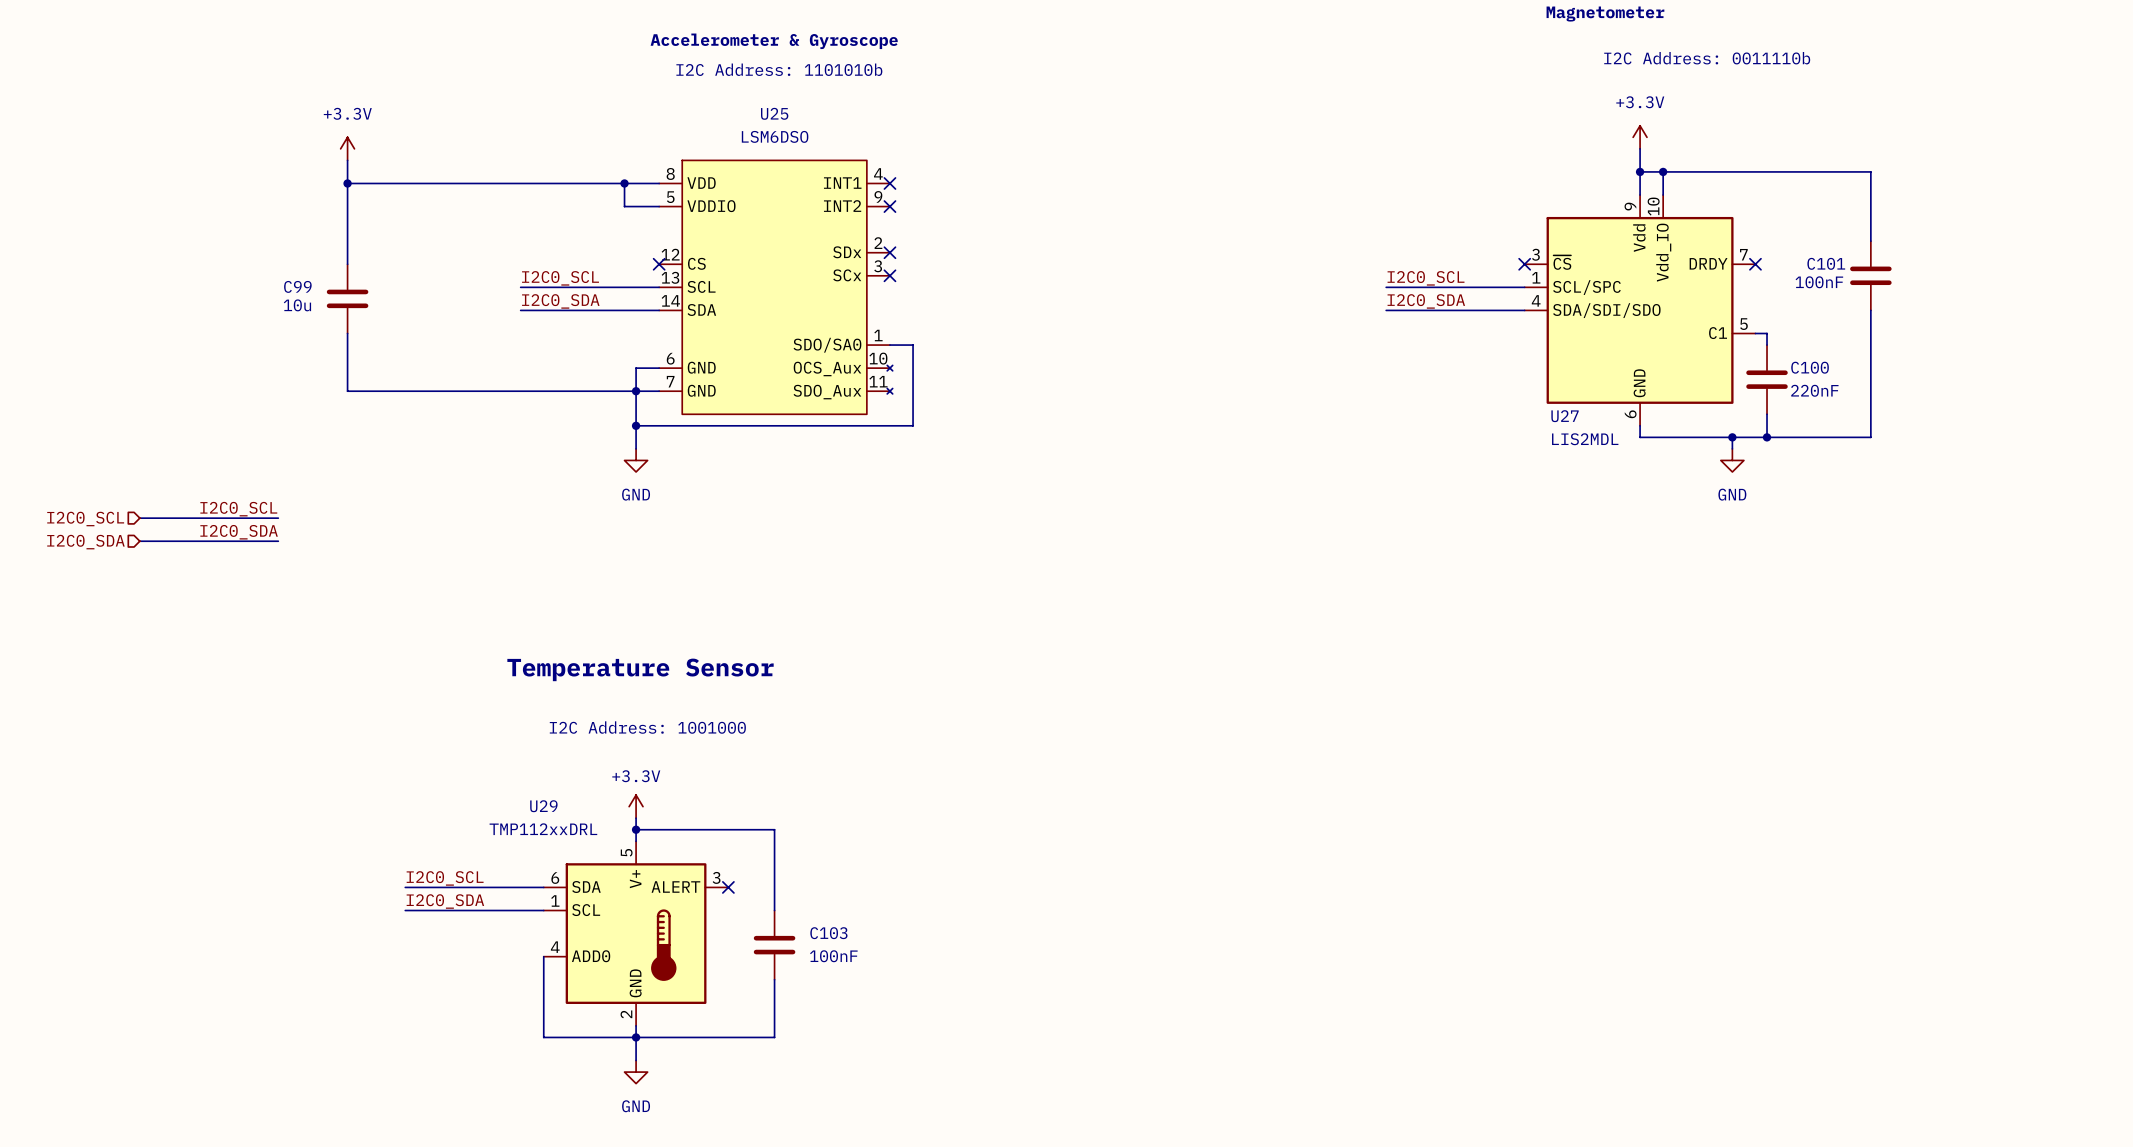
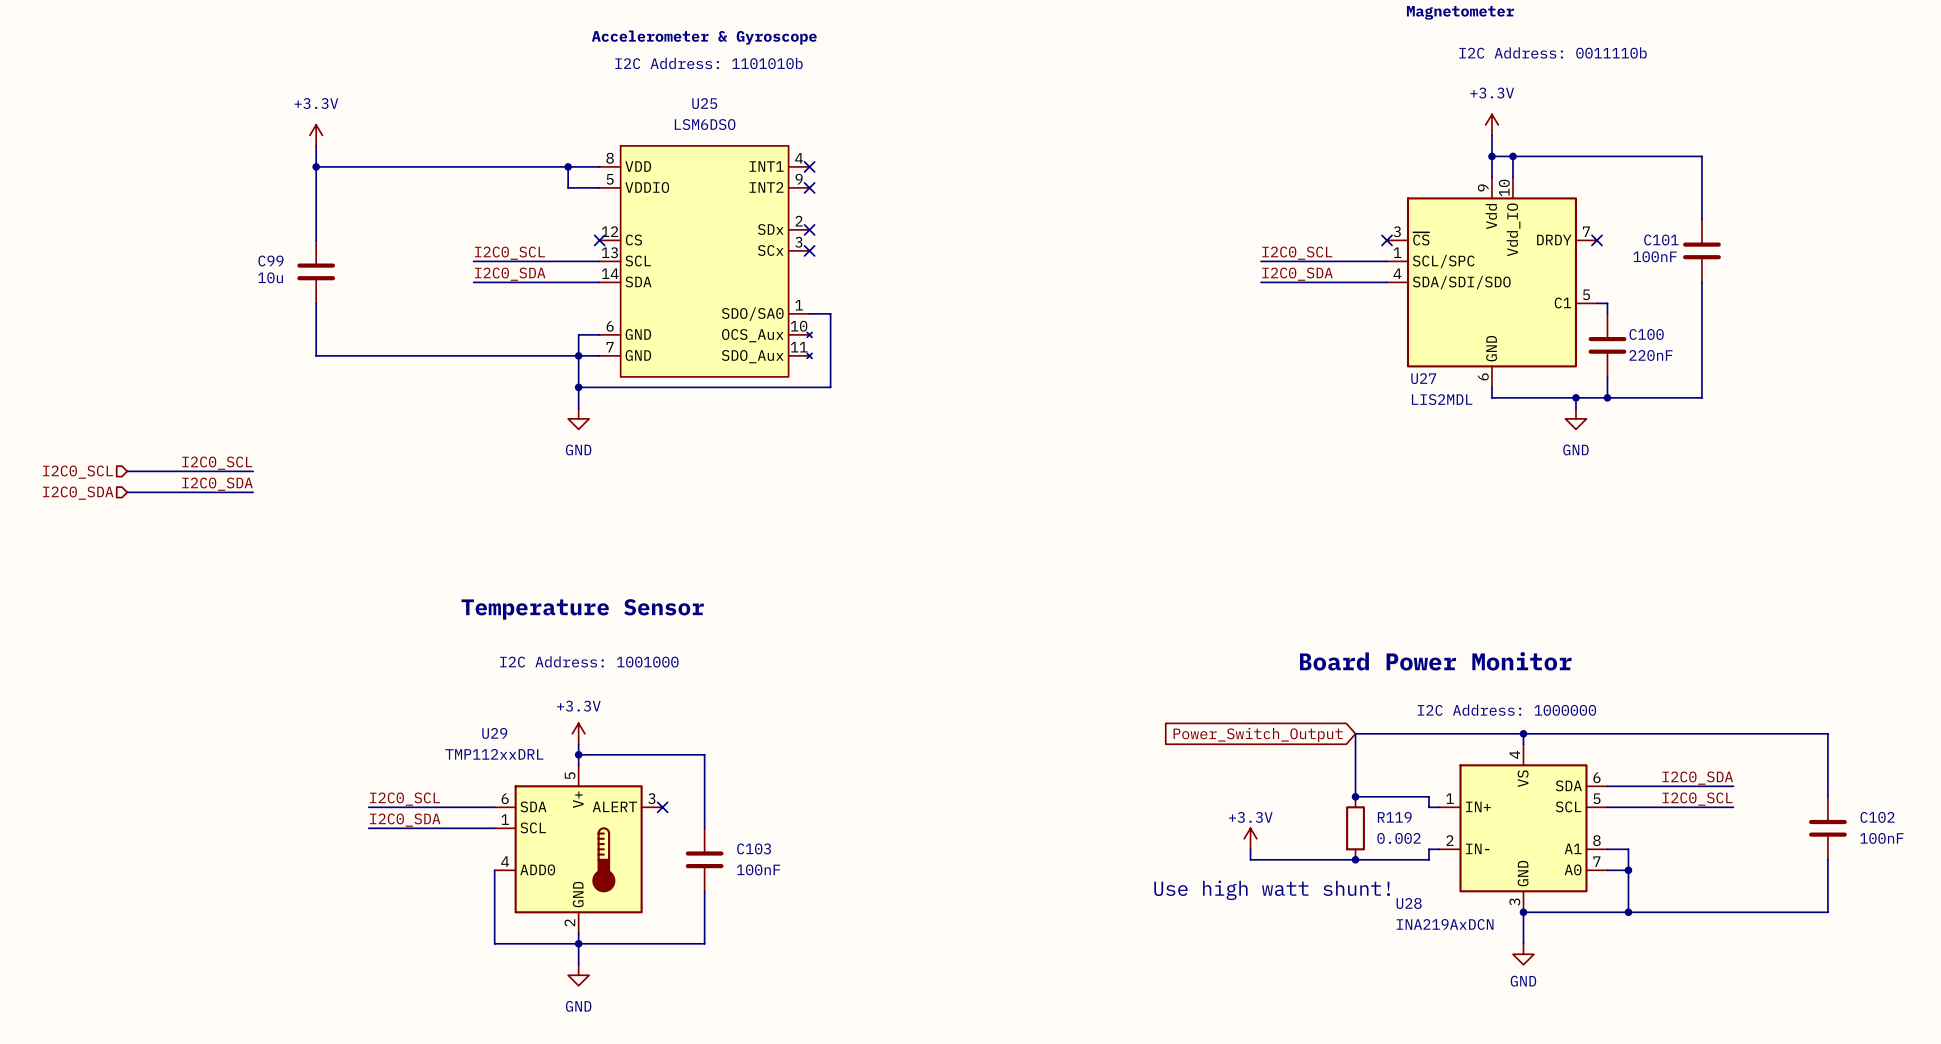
text: none -> Board Power Monitor (1435, 661)
text: none -> I2C Address: 1000000 (1506, 710)
wire: none -> (1523, 733) (1523, 744)
junction: none -> (1523, 733)
global label: none -> Power_Switch_Output (1258, 734)
label: none -> I2C0_SDA (1697, 778)
wire: none -> (1607, 786) (1733, 786)
junction: none -> (1355, 796)
wire: none -> (1827, 796) (1827, 733) (1355, 733) (1355, 796) (1429, 796) (1429, 807) (1439, 807)
label: none -> I2C0_SCL (1697, 799)
wire: none -> (1607, 807) (1733, 807)
R119: none -> 0.002 (1355, 828)
U28: none -> INA219AxDCN (1523, 828)
C102: none -> 100nF (1827, 828)
power symbol: none -> +3.3V (1250, 838)
wire: none -> (1250, 849) (1250, 859) (1429, 859) (1429, 849) (1439, 849)
wire: none -> (1607, 849) (1628, 849) (1628, 912)
junction: none -> (1355, 859)
wire: none -> (1827, 859) (1827, 912) (1523, 912) (1523, 943)
wire: none -> (1607, 870) (1628, 870)
junction: none -> (1628, 870)
text: none -> Use high watt shunt! (1272, 890)
junction: none -> (1523, 912)
junction: none -> (1628, 912)
power symbol: none -> GND (1523, 954)

